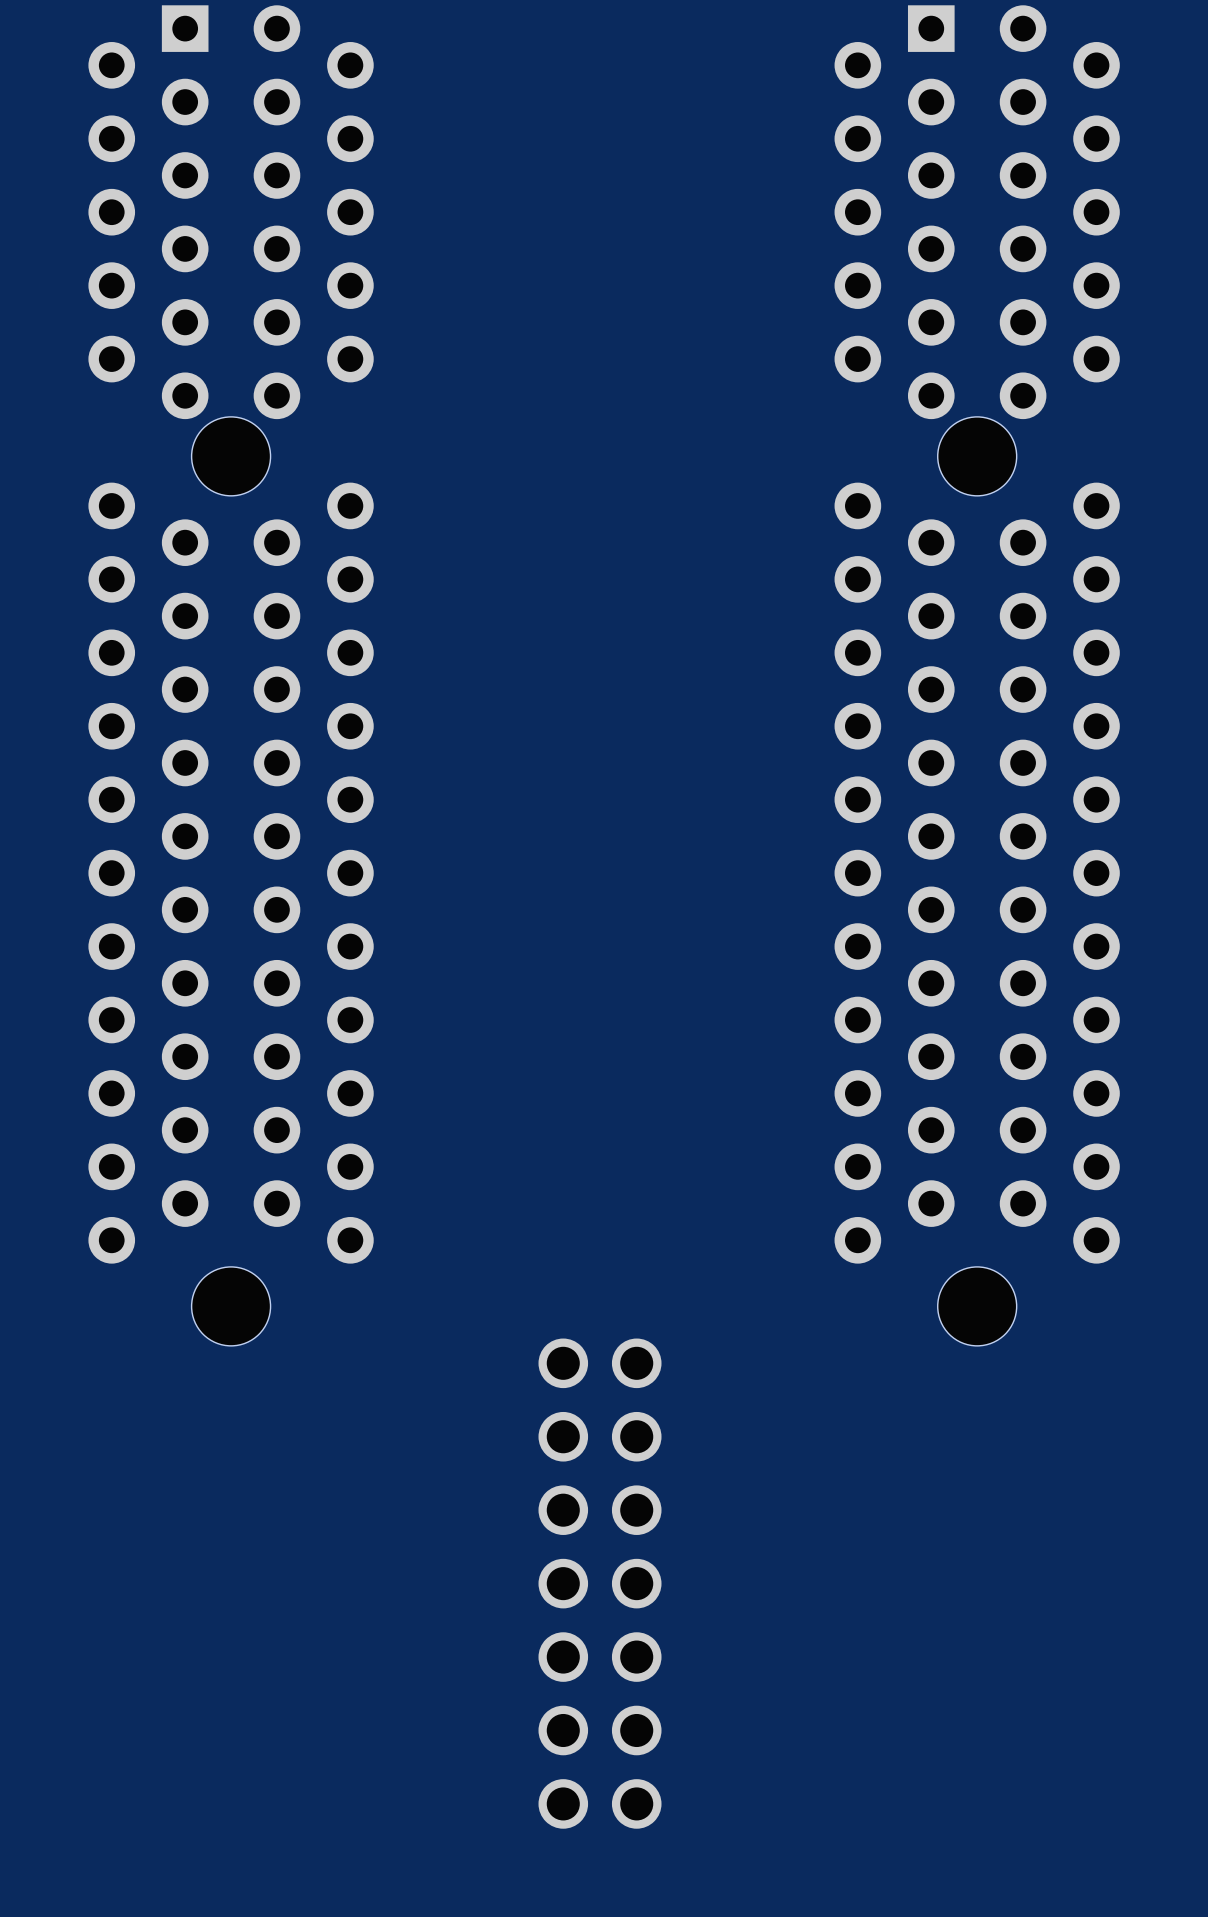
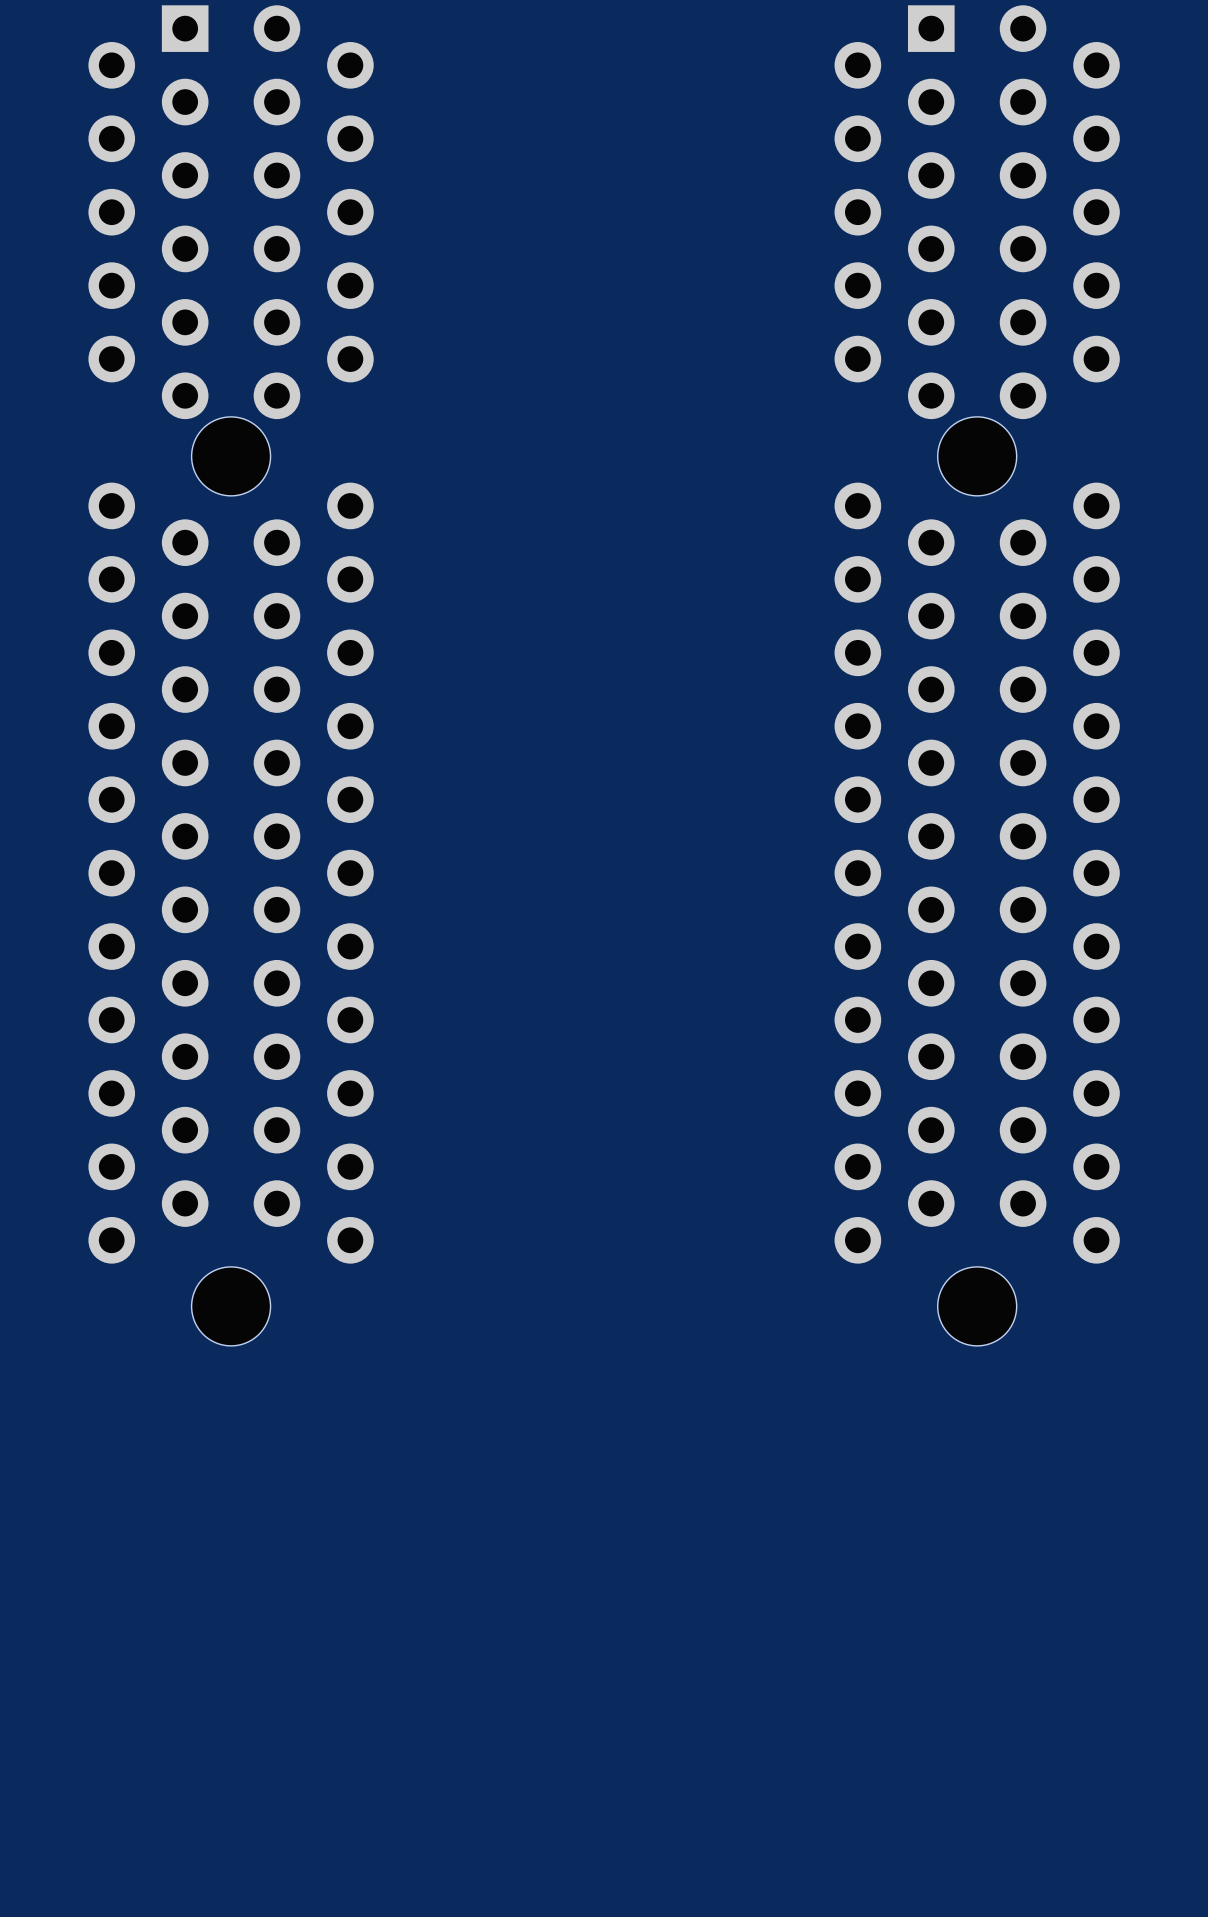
part: (600, 1583) -> none

